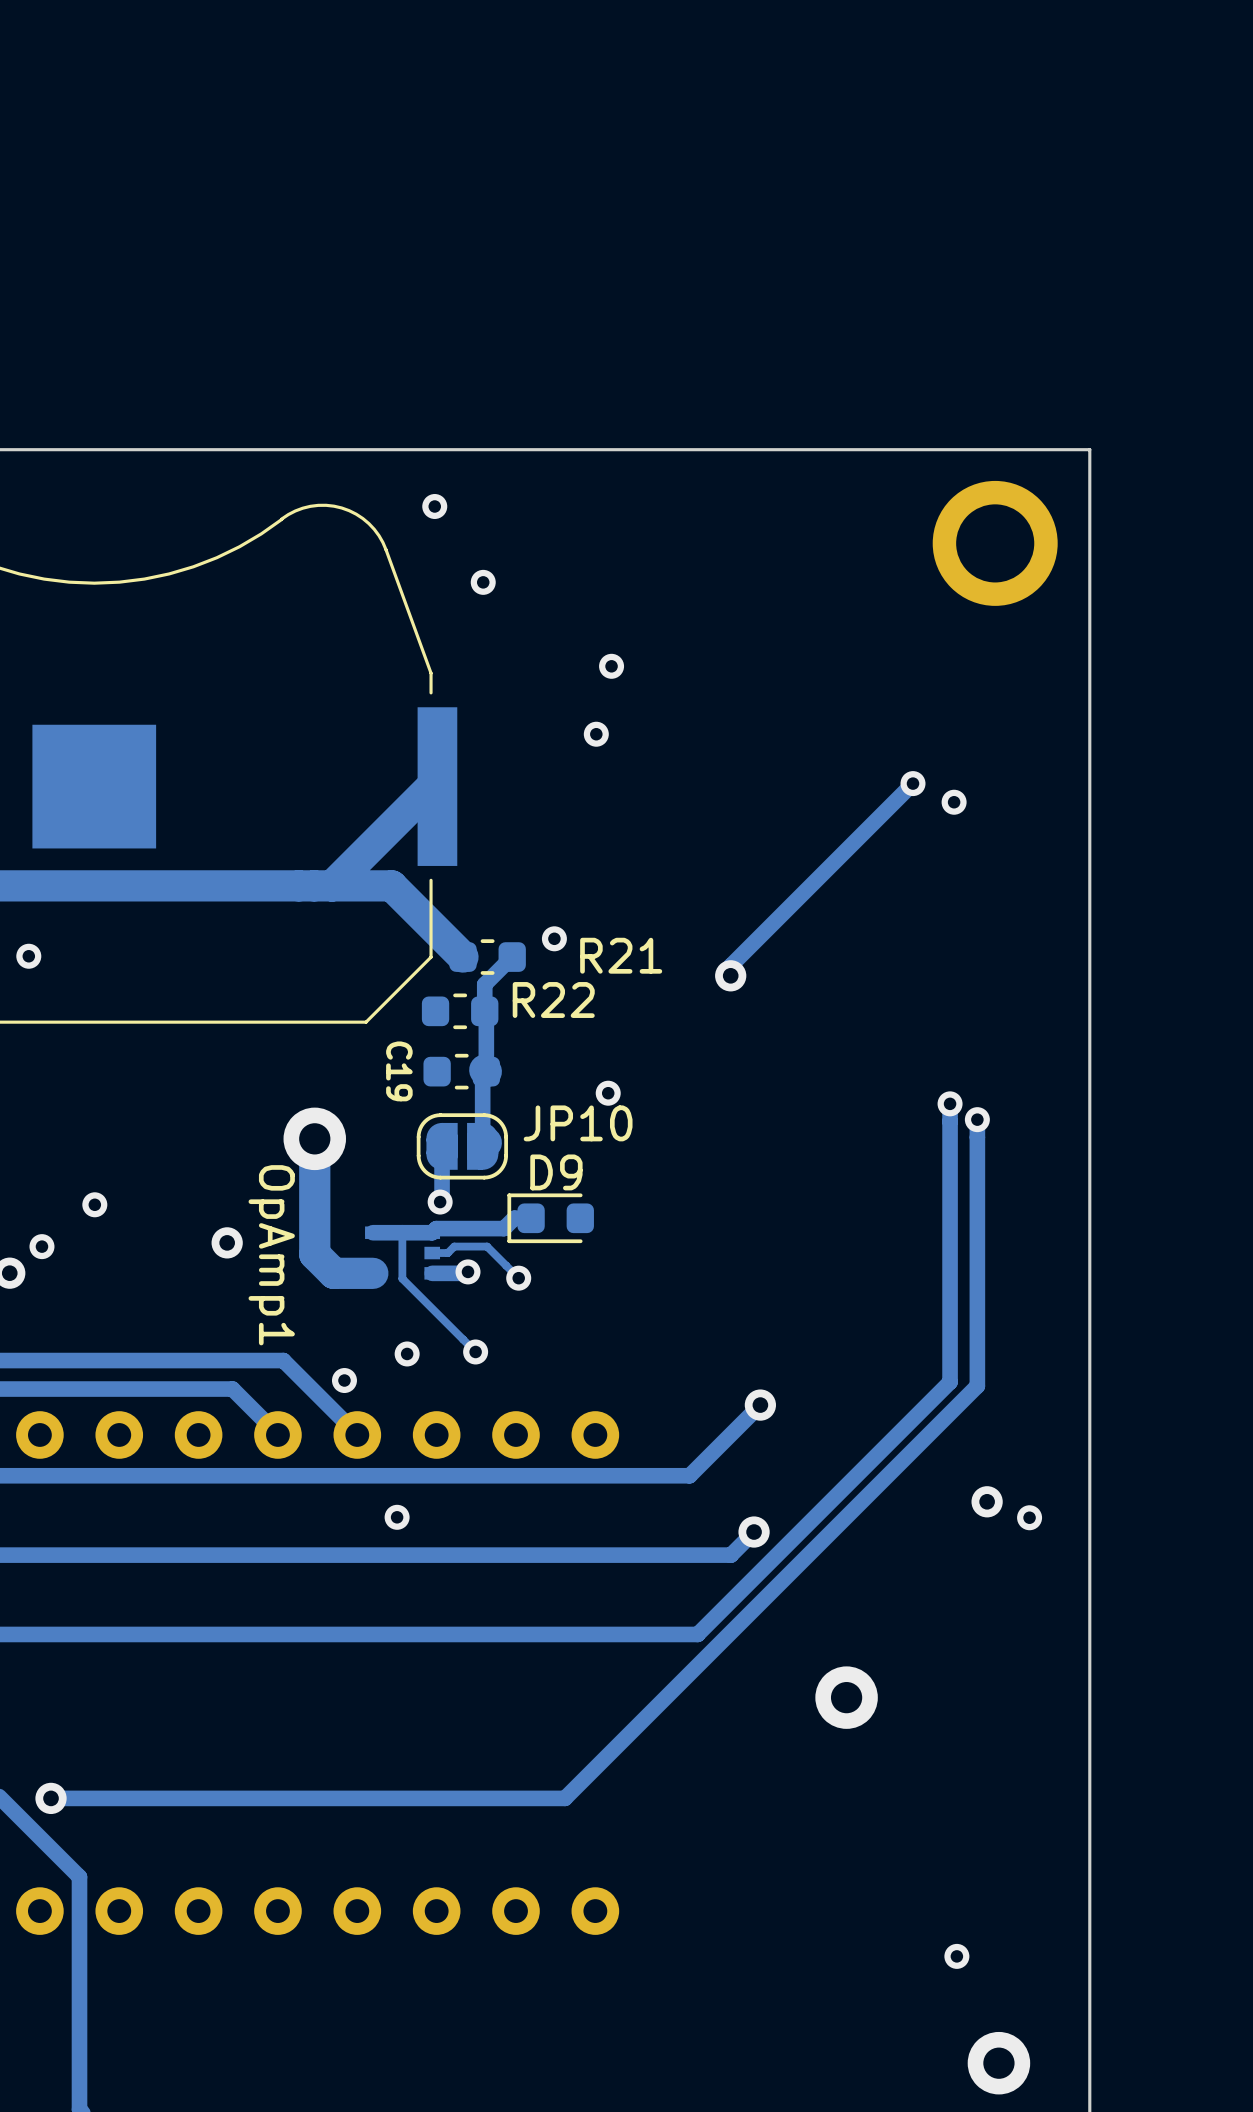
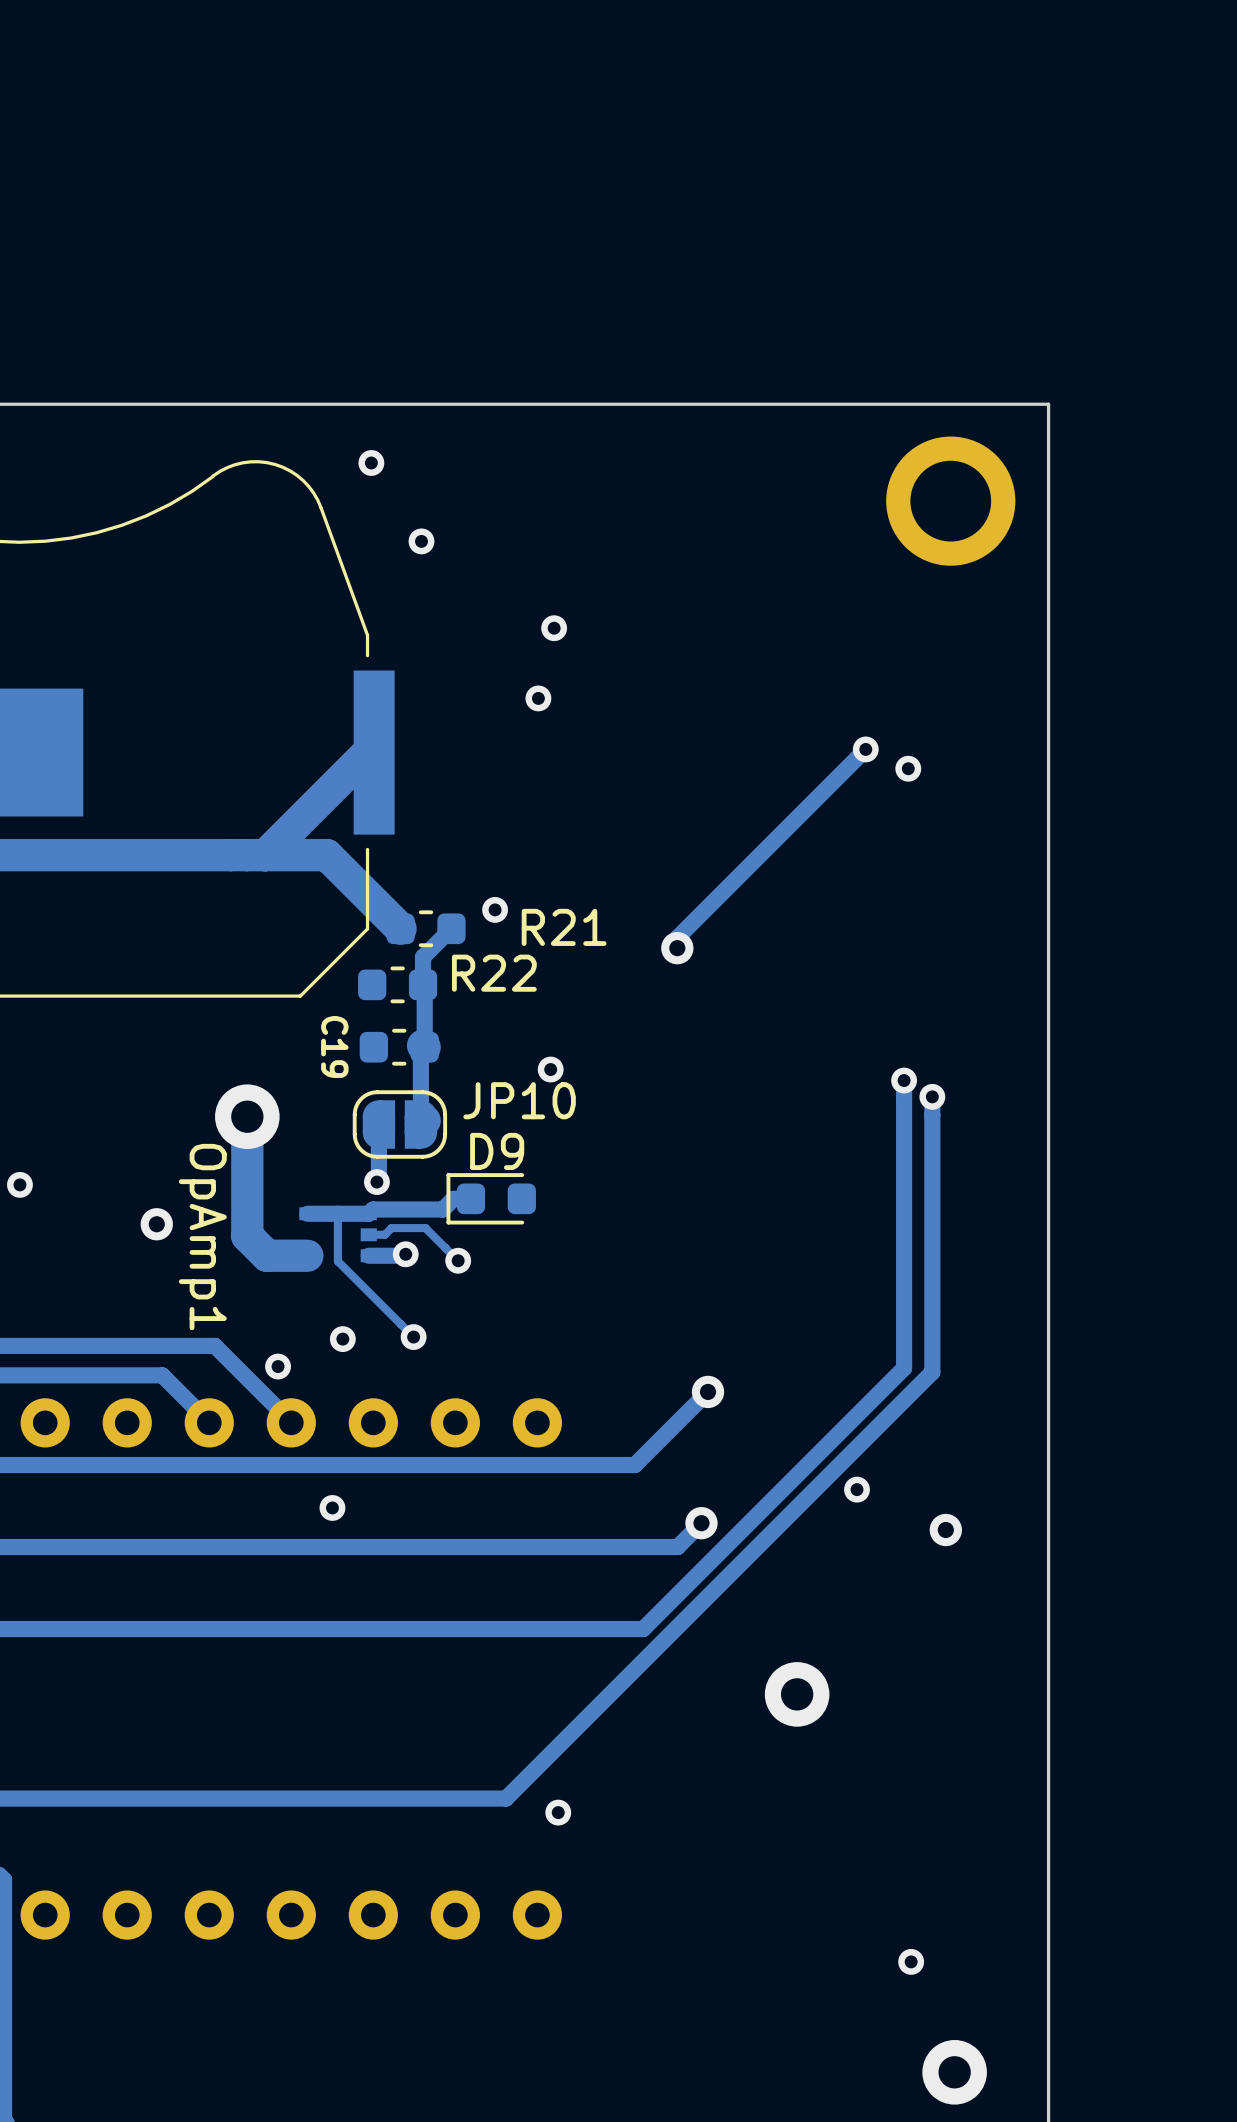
via position: (987, 1501) -> (945, 1530)
via position: (1029, 1517) -> (857, 1489)
via: none -> (558, 1812)

